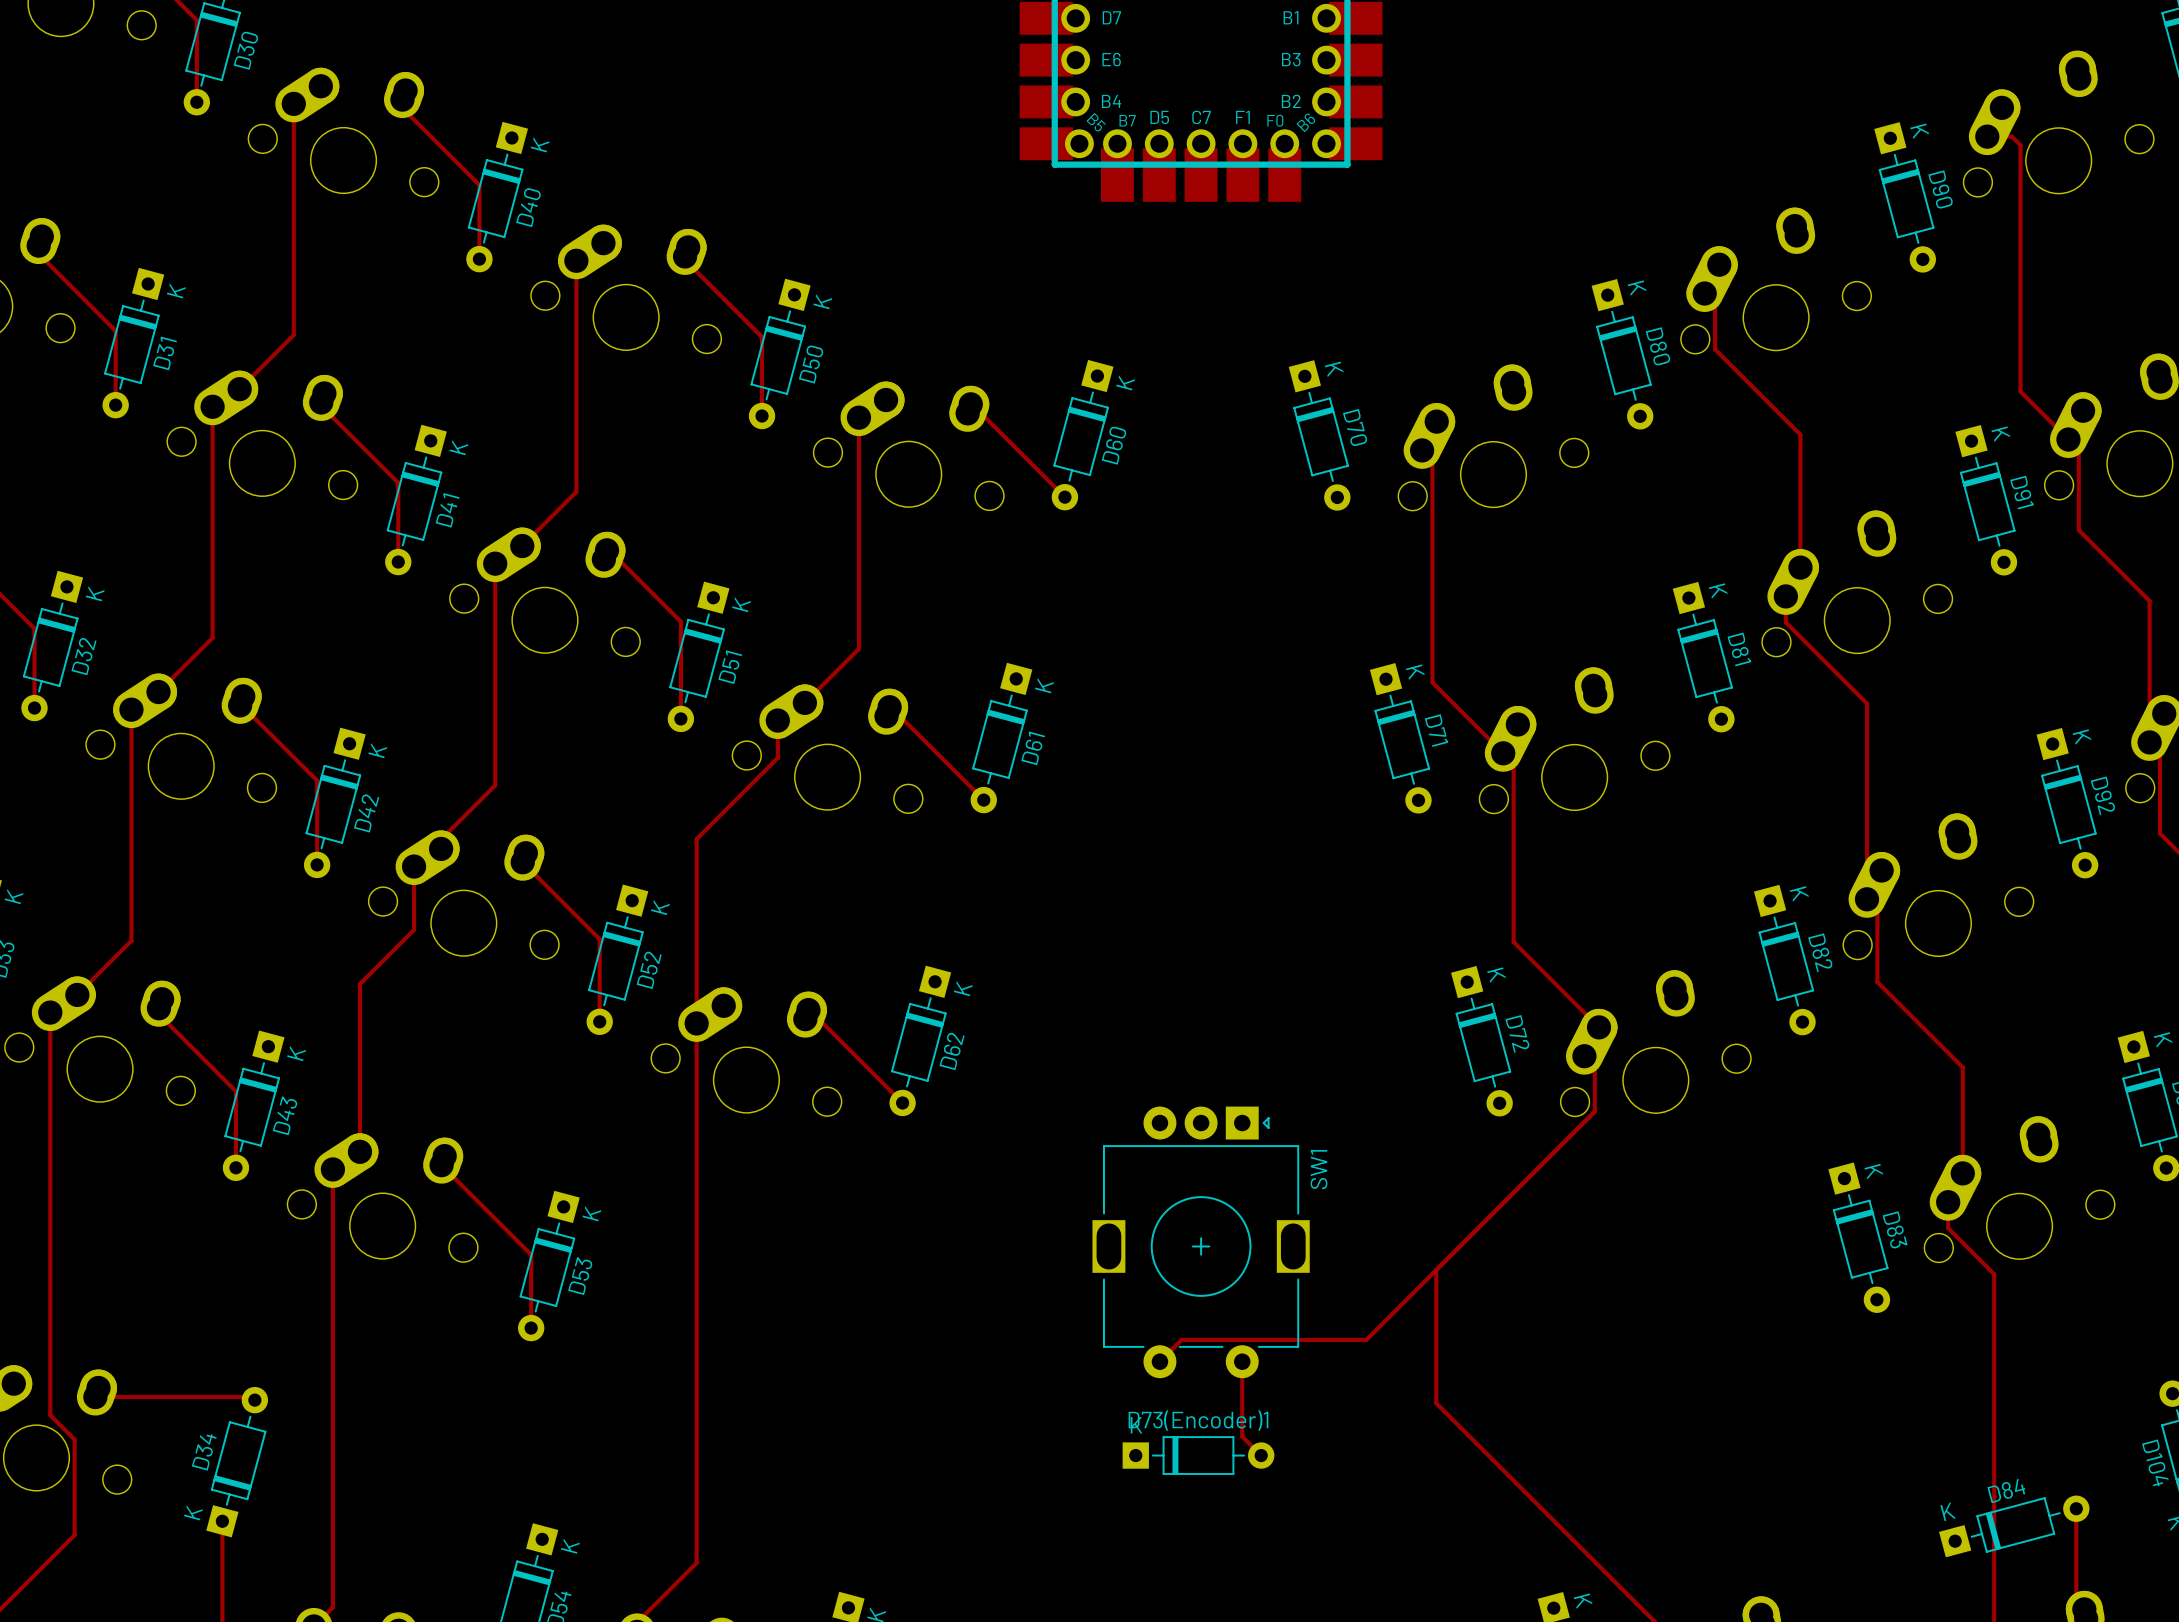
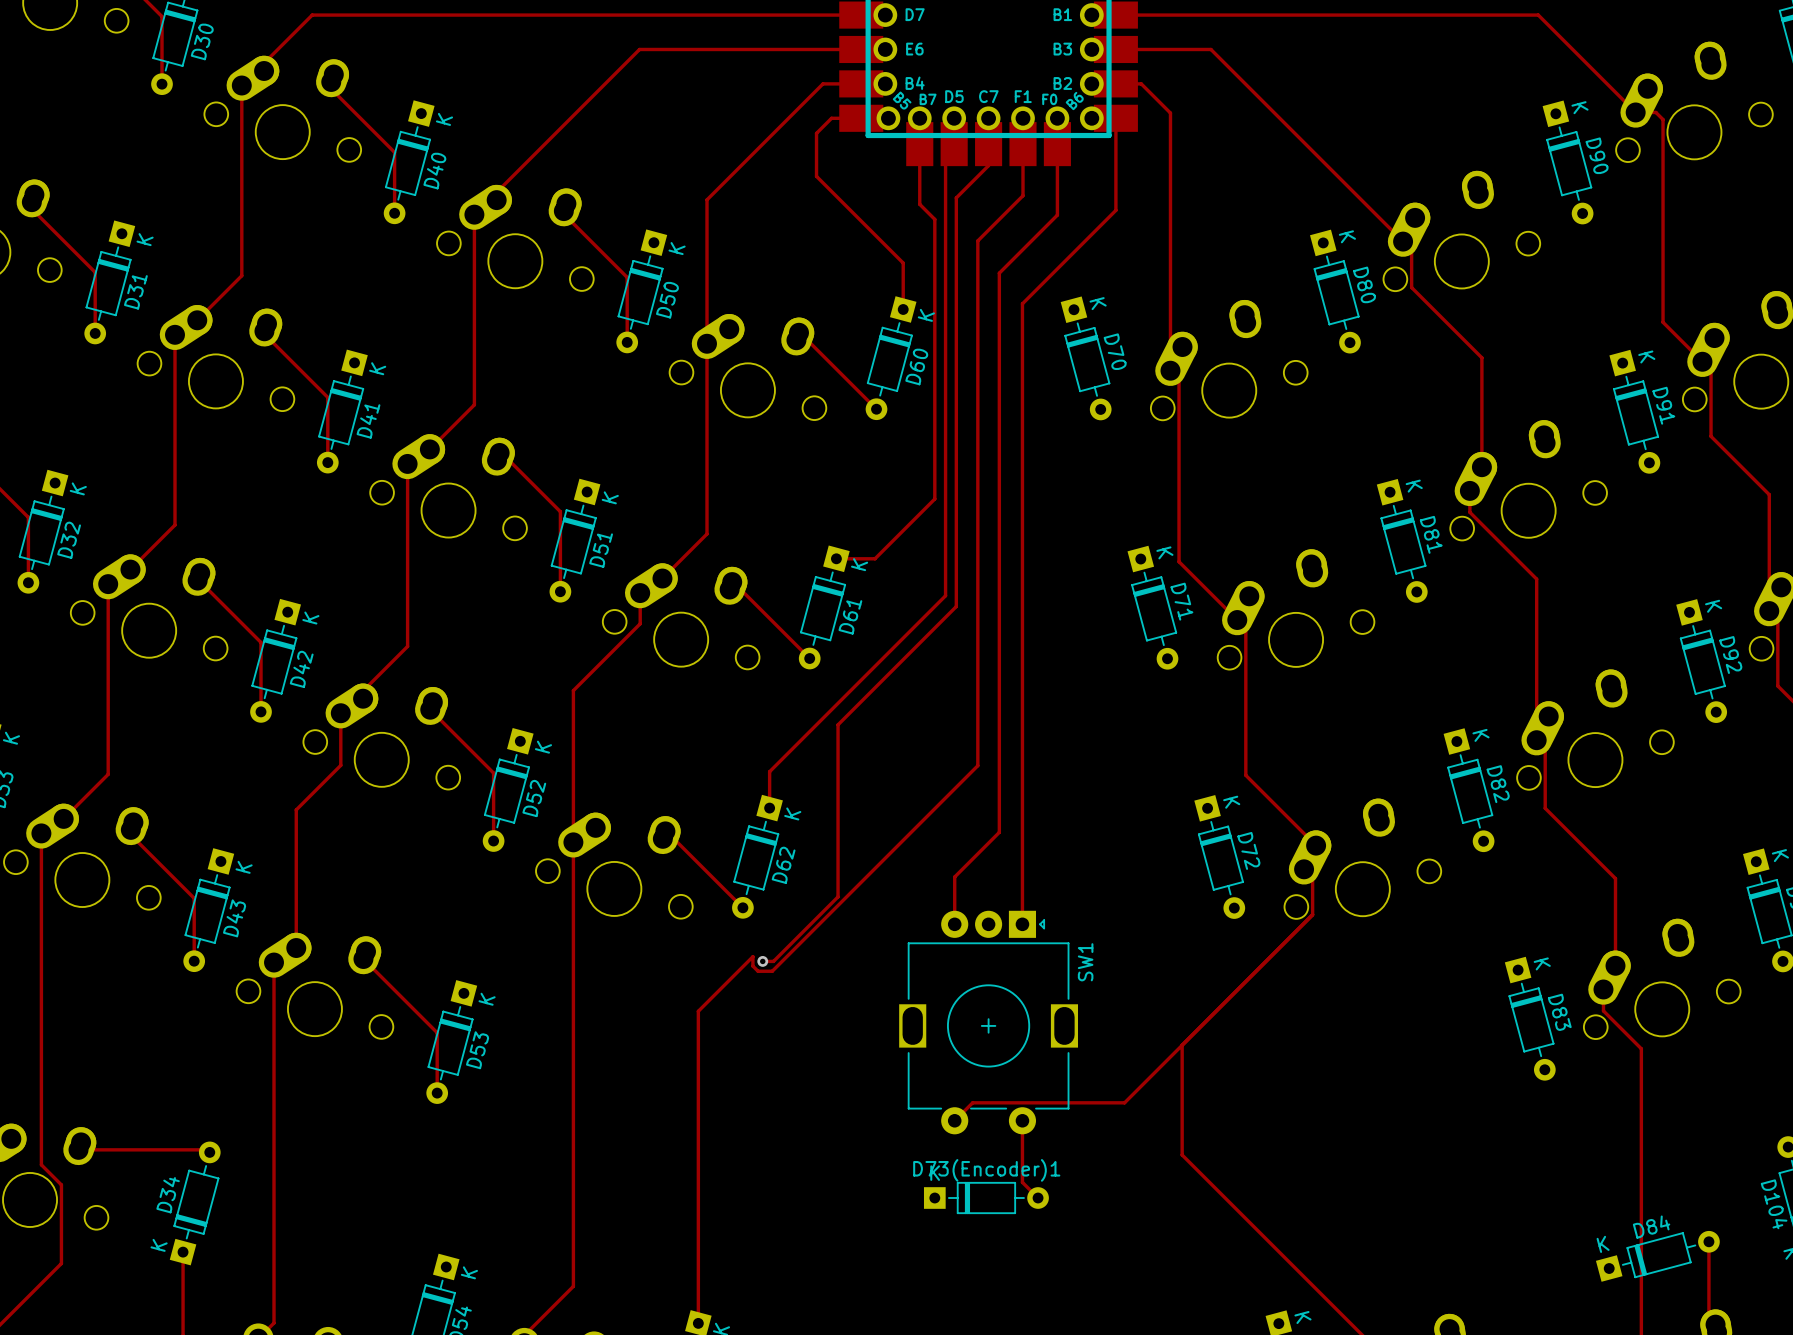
track: none -> (885, 15) (312, 15) (241, 85)
track: none -> (1091, 15) (1538, 15) (1635, 112)
track: none -> (885, 49) (639, 49) (474, 214)
track: none -> (1091, 49) (1210, 49) (1403, 241)
track: none -> (885, 83) (822, 83) (707, 199) (707, 343)
track: none -> (1091, 83) (1141, 83) (1170, 113) (1170, 370)
track: none -> (888, 118) (831, 118) (816, 133) (816, 176) (903, 263) (903, 309)
track: none -> (919, 118) (919, 204) (934, 219) (934, 499) (875, 558) (836, 558)
track: none -> (954, 118) (945, 126) (945, 595) (769, 771) (769, 808)
track: none -> (988, 118) (988, 165) (956, 197) (956, 606) (838, 724) (838, 896) (773, 961) (762, 961)
track: none -> (1023, 118) (1023, 195) (977, 240) (977, 765) (772, 971) (758, 971) (752, 966) (752, 956) (698, 1011) (698, 1323)
track: none -> (1057, 118) (1057, 215) (999, 273) (999, 832) (954, 876) (954, 924)
track: none -> (1091, 118) (1115, 118) (1115, 210) (1022, 303) (1022, 924)
via: none -> (762, 961)

